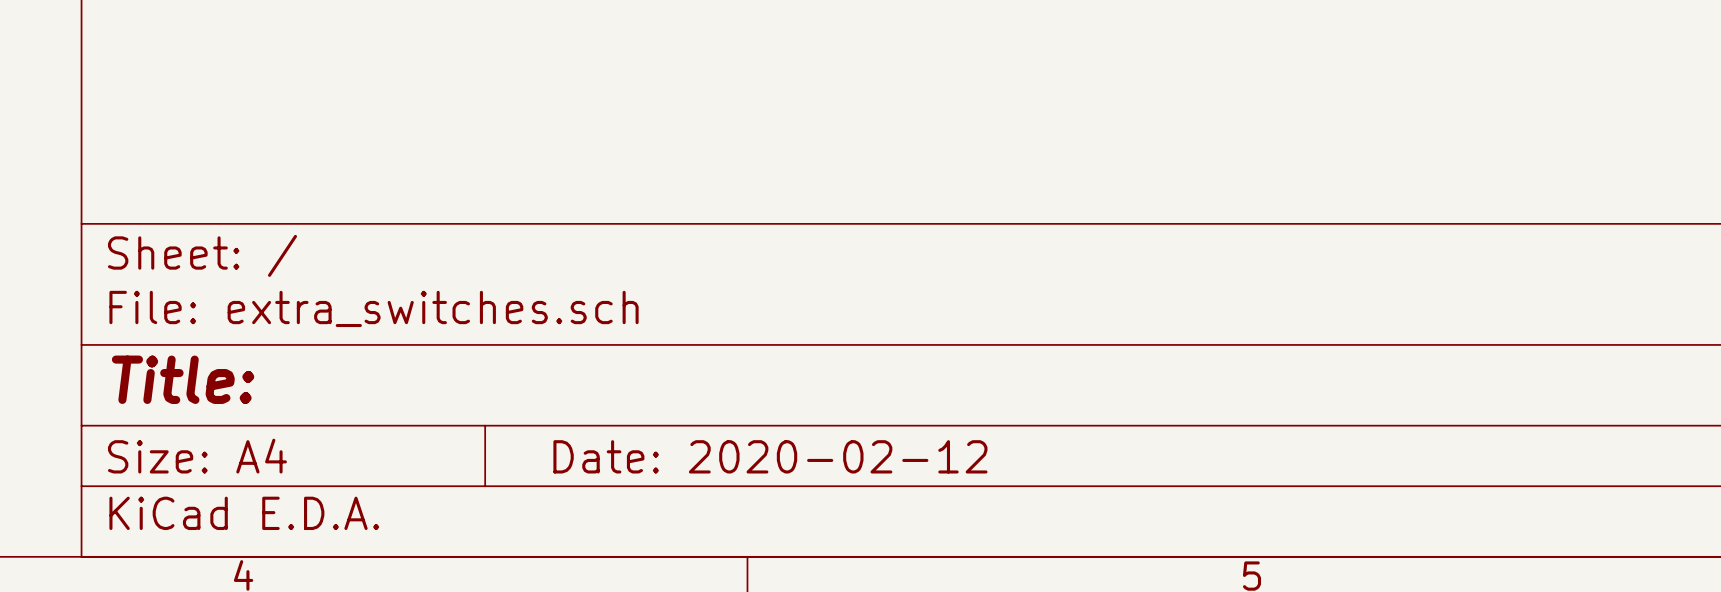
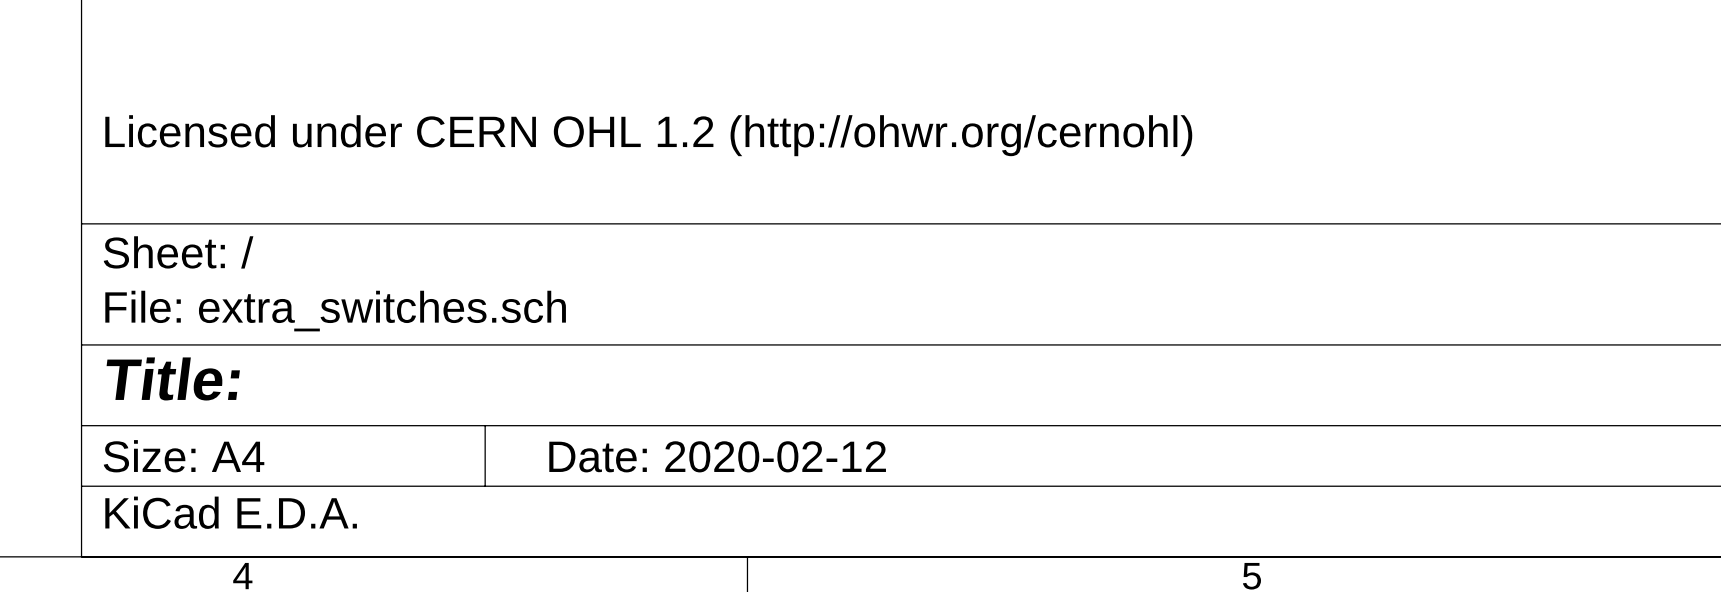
title block: none -> Licensed under CERN OHL 1.2 (http://ohwr.org/cernohl) (648, 135)

